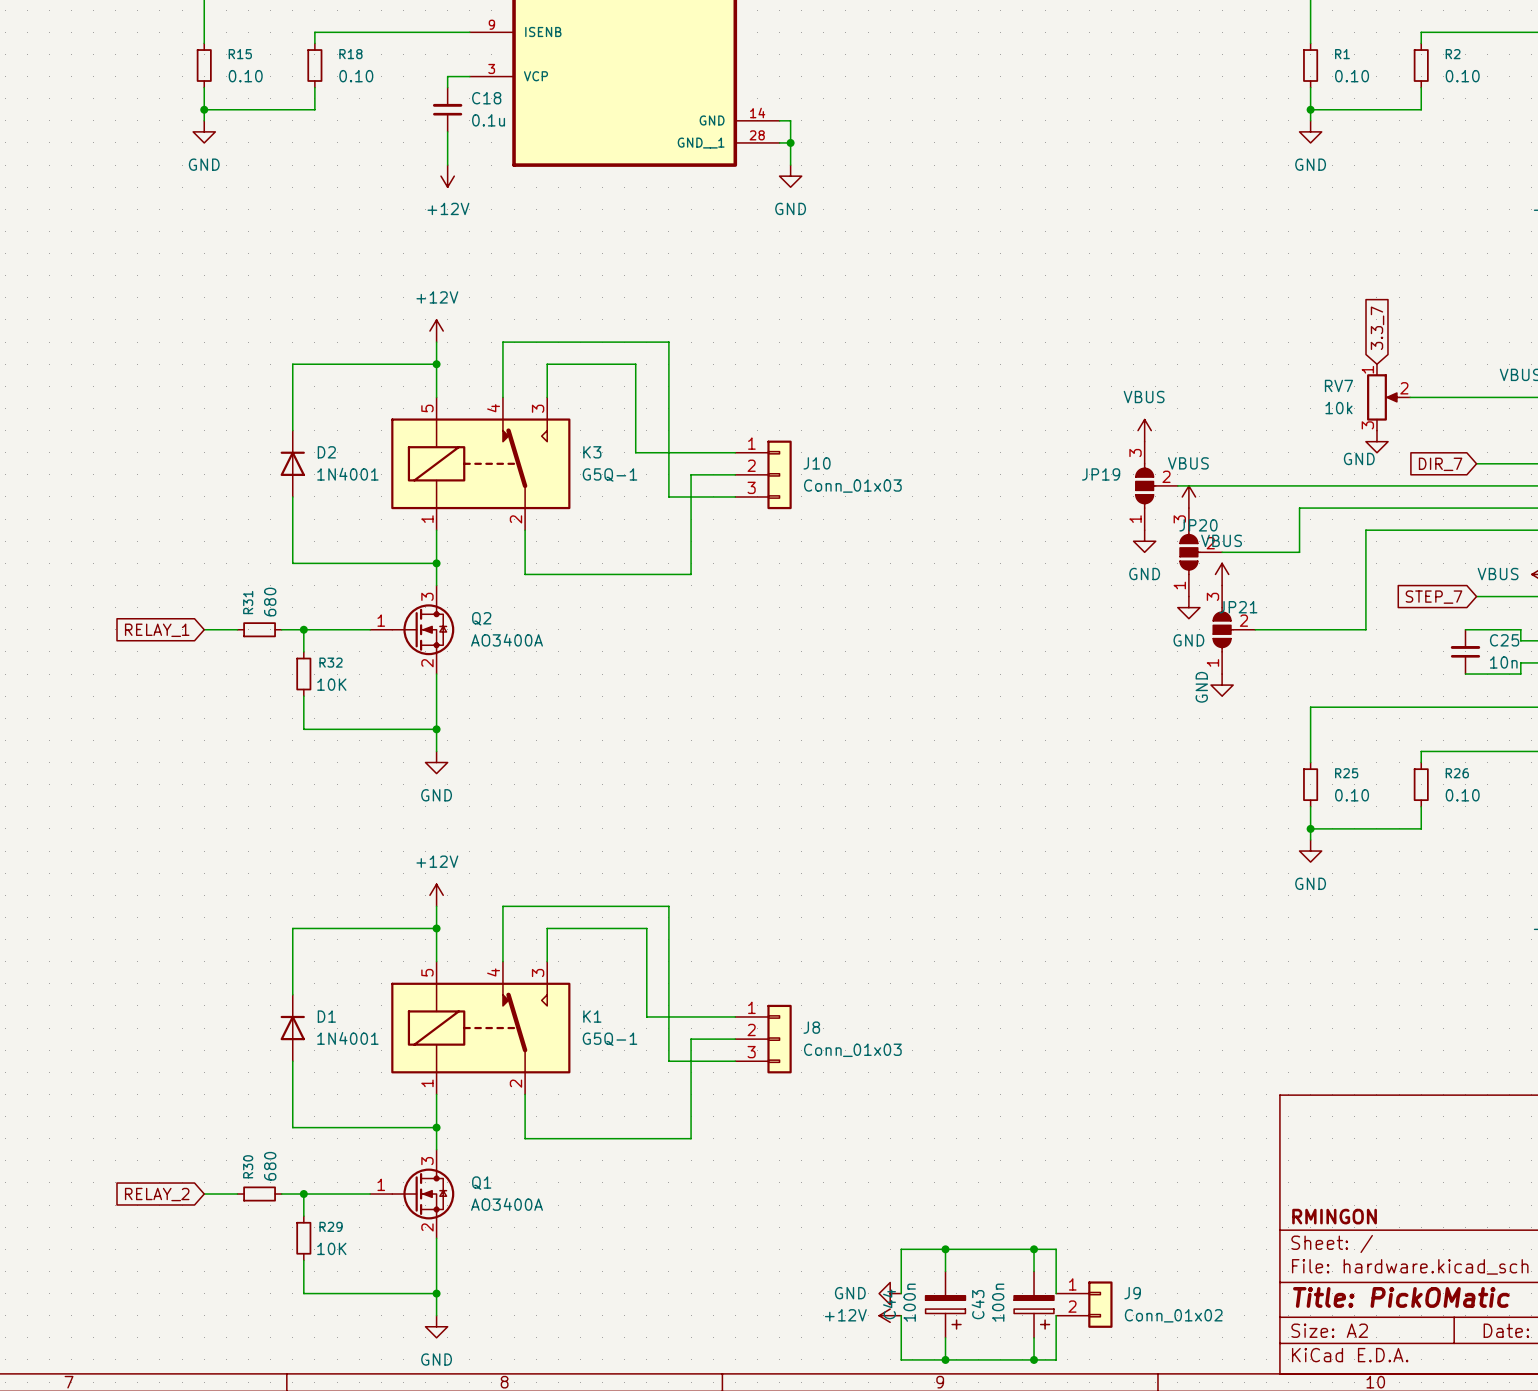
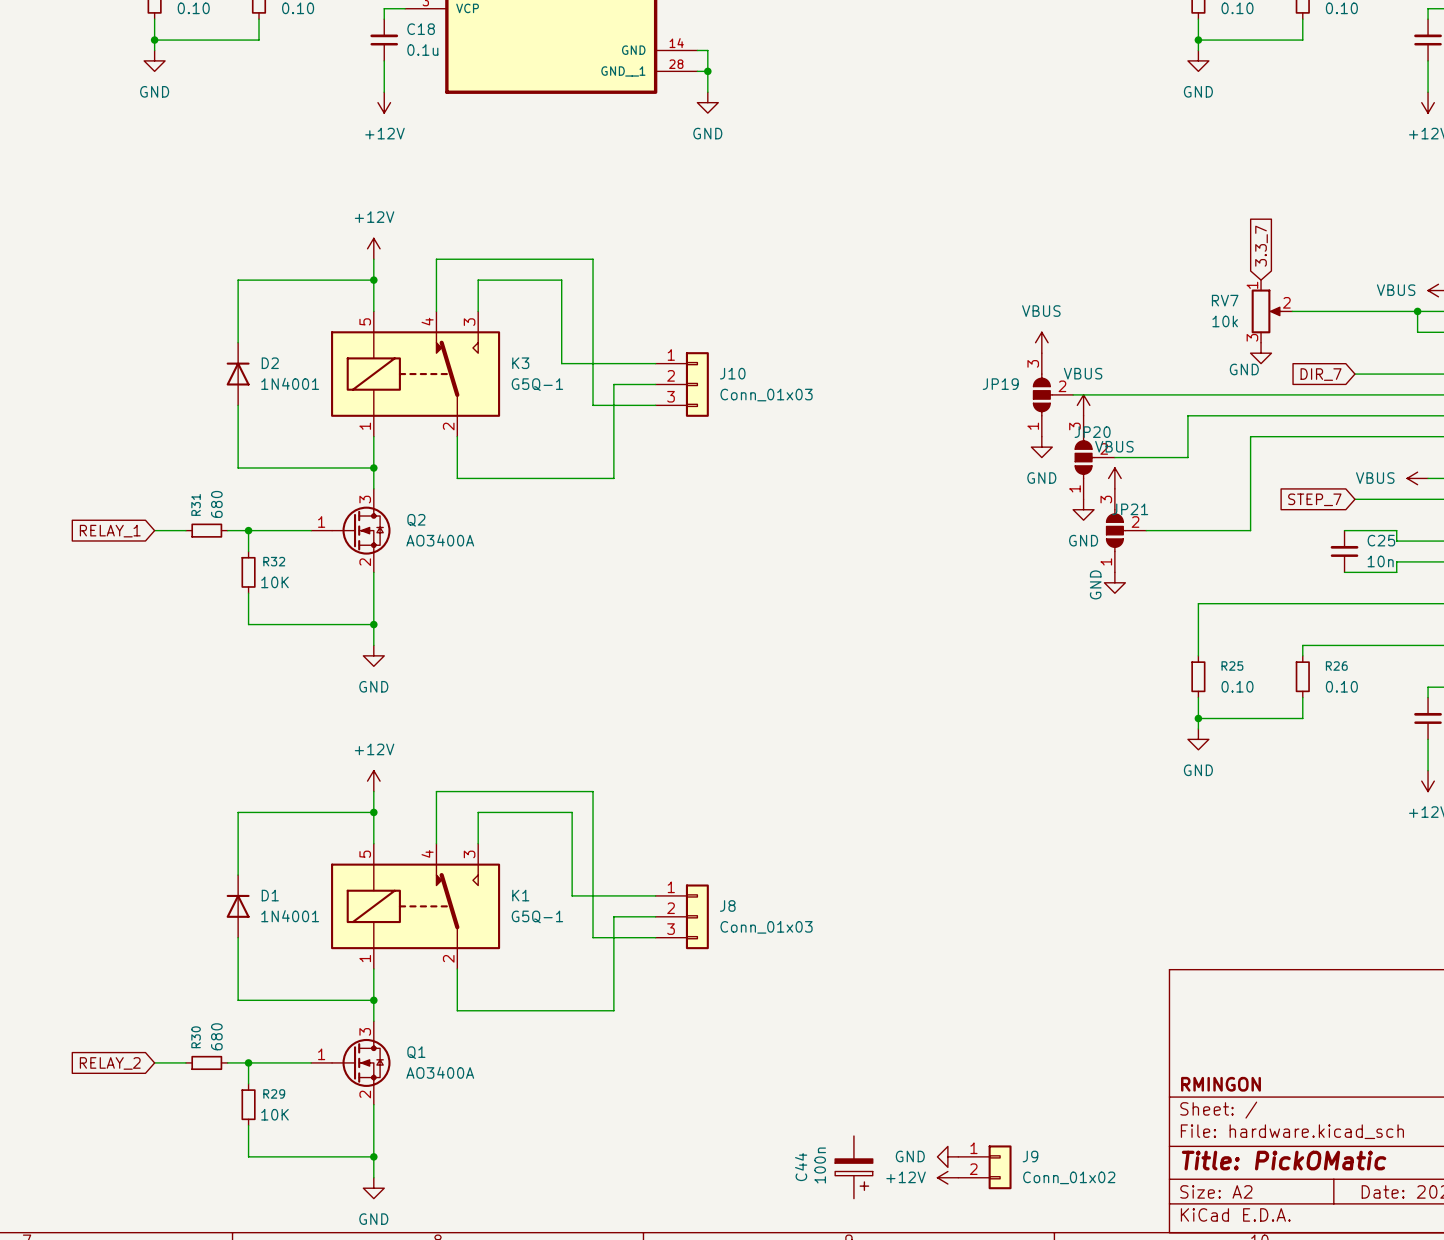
wire: (945, 1249) (945, 1271) -> none
junction: (945, 1249) -> none
wire: (1034, 1249) (1034, 1271) -> none
junction: (1034, 1249) -> none
power symbol position: GND (890, 1293) -> GND (947, 1156)
wire: (901, 1293) (901, 1249) (1056, 1249) (1056, 1293) -> none
C43: 100n (1034, 1304) -> none
power symbol position: +12V (890, 1315) -> +12V (947, 1177)
wire: (901, 1315) (901, 1359) (1056, 1359) (1056, 1315) -> none
wire: (945, 1337) (945, 1359) -> none
wire: (1034, 1337) (1034, 1359) -> none
junction: (945, 1359) -> none
junction: (1034, 1359) -> none

